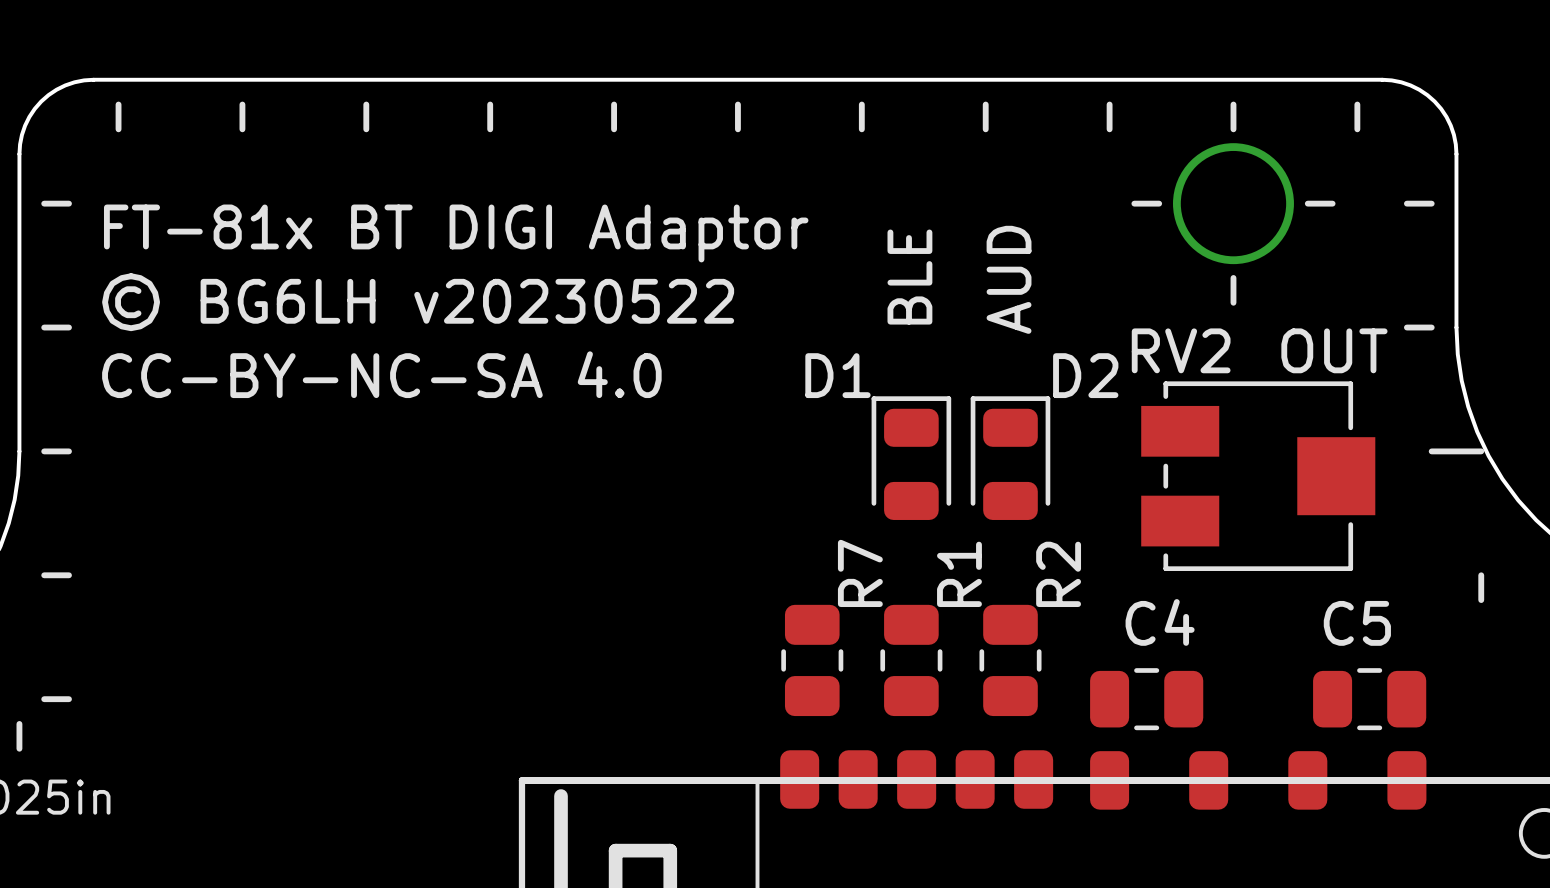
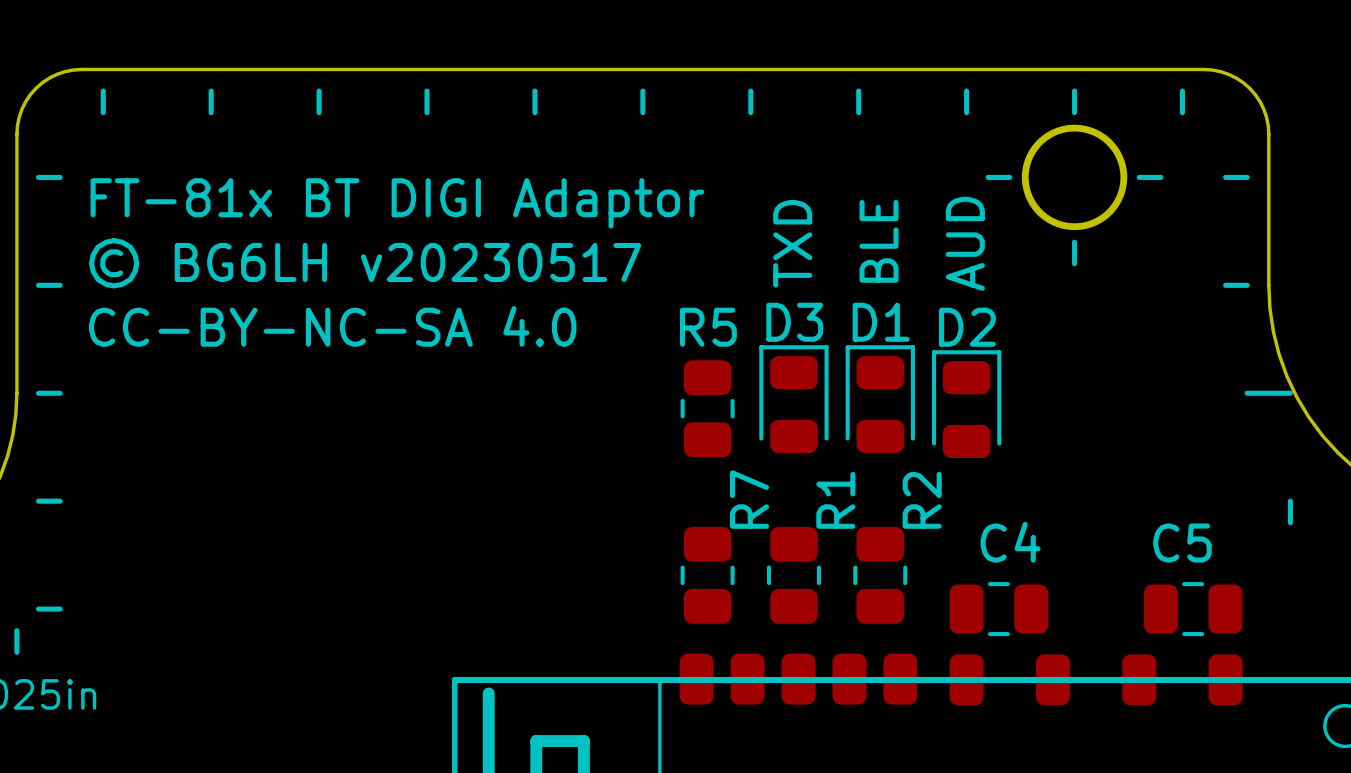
text: BLE (909, 277) -> TXD (792, 243)
text: AUD (1009, 279) -> BLE (879, 241)
text: none -> AUD (965, 243)
text: © BG6LH v20230522 (418, 302) -> © BG6LH v20230517 (365, 263)
text: OUT (1334, 350) -> none
D1 name: D1 (837, 375) -> D3 (794, 322)
D2 name: D2 (1085, 375) -> D1 (881, 322)
D2: none -> (966, 404)
R5: none -> (707, 408)
RV2: (1258, 476) -> none

